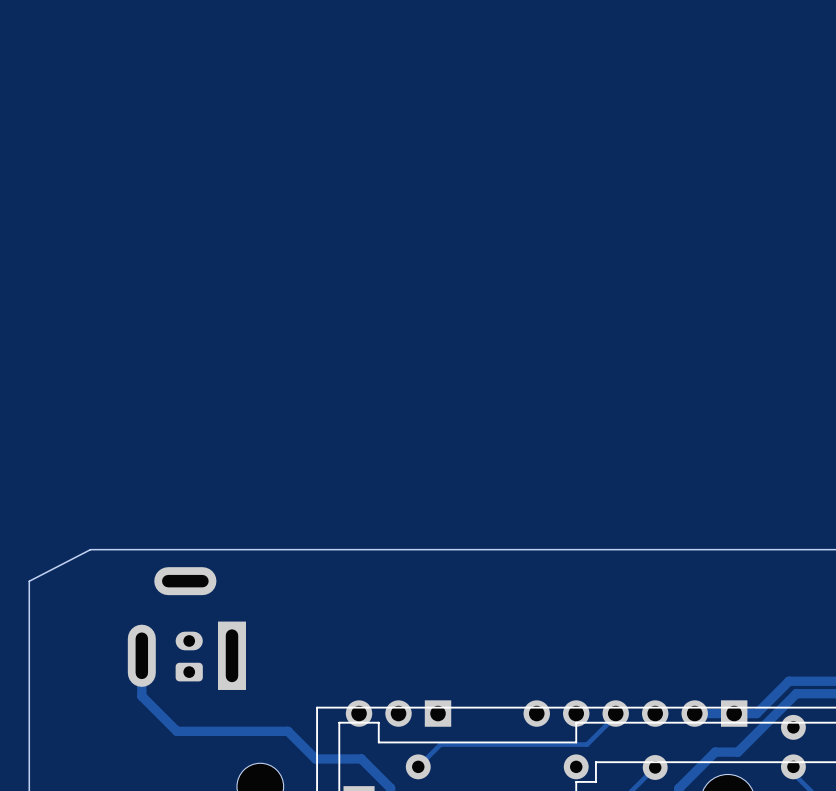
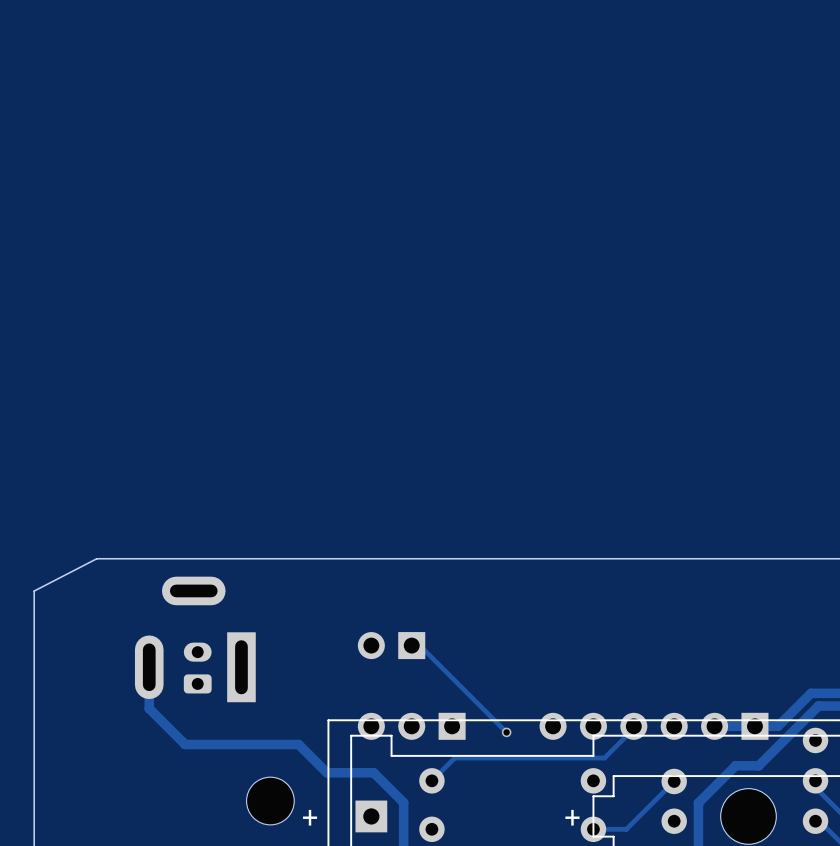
part: none -> (391, 645)
track: none -> (411, 645) (419, 645) (506, 732)
via: none -> (506, 732)

